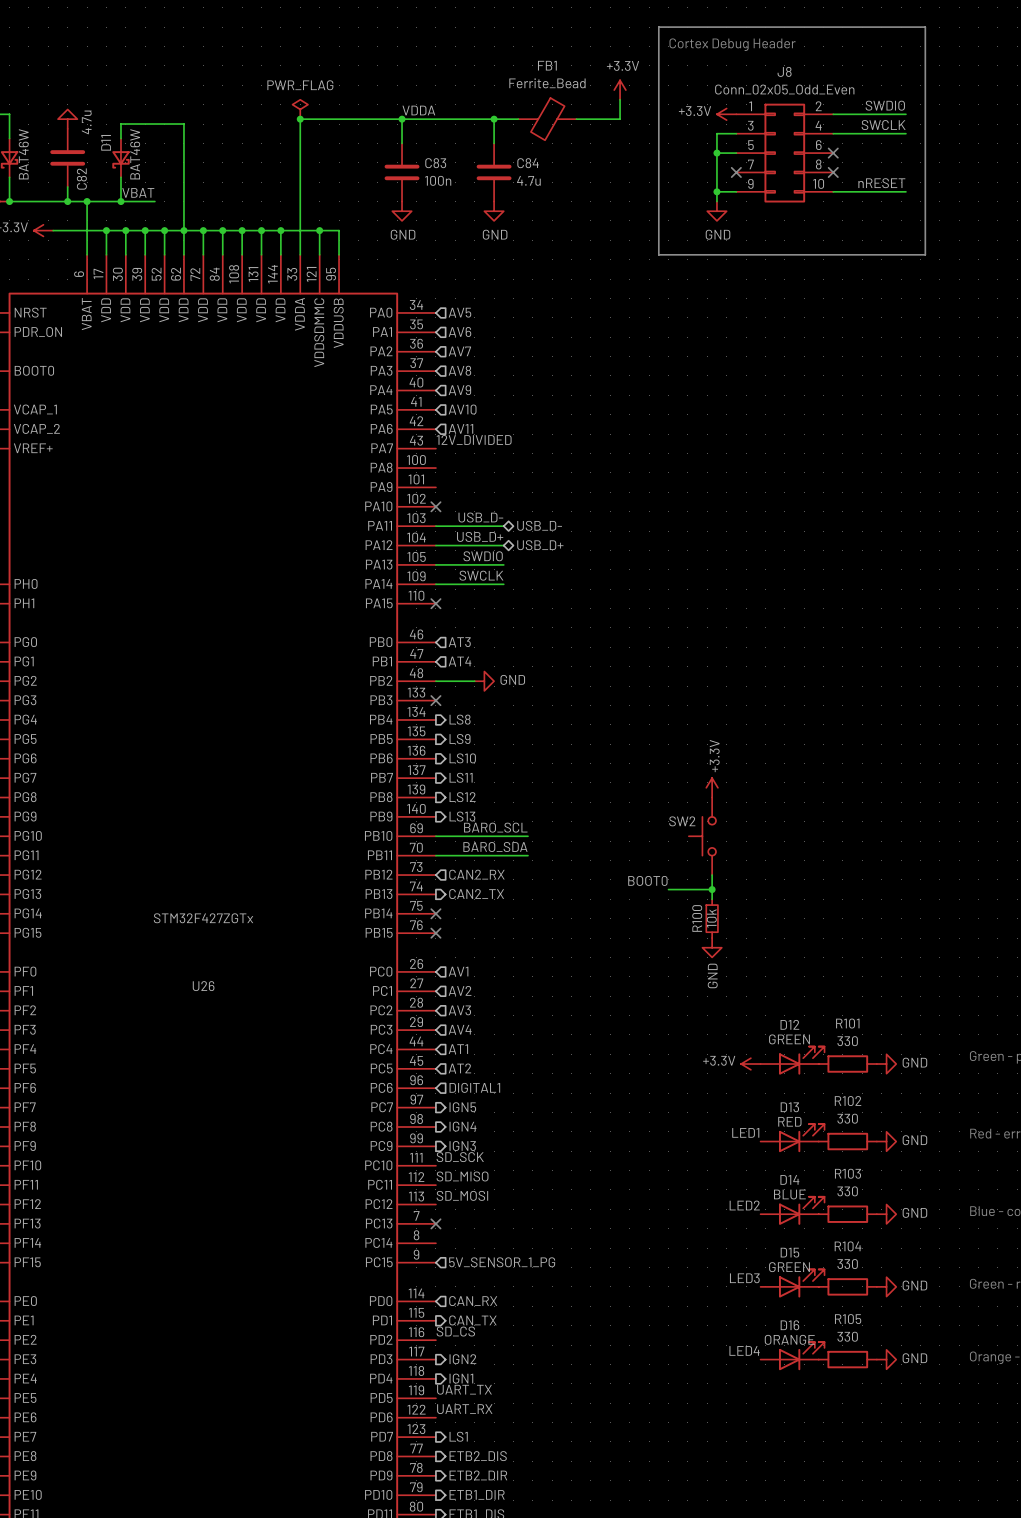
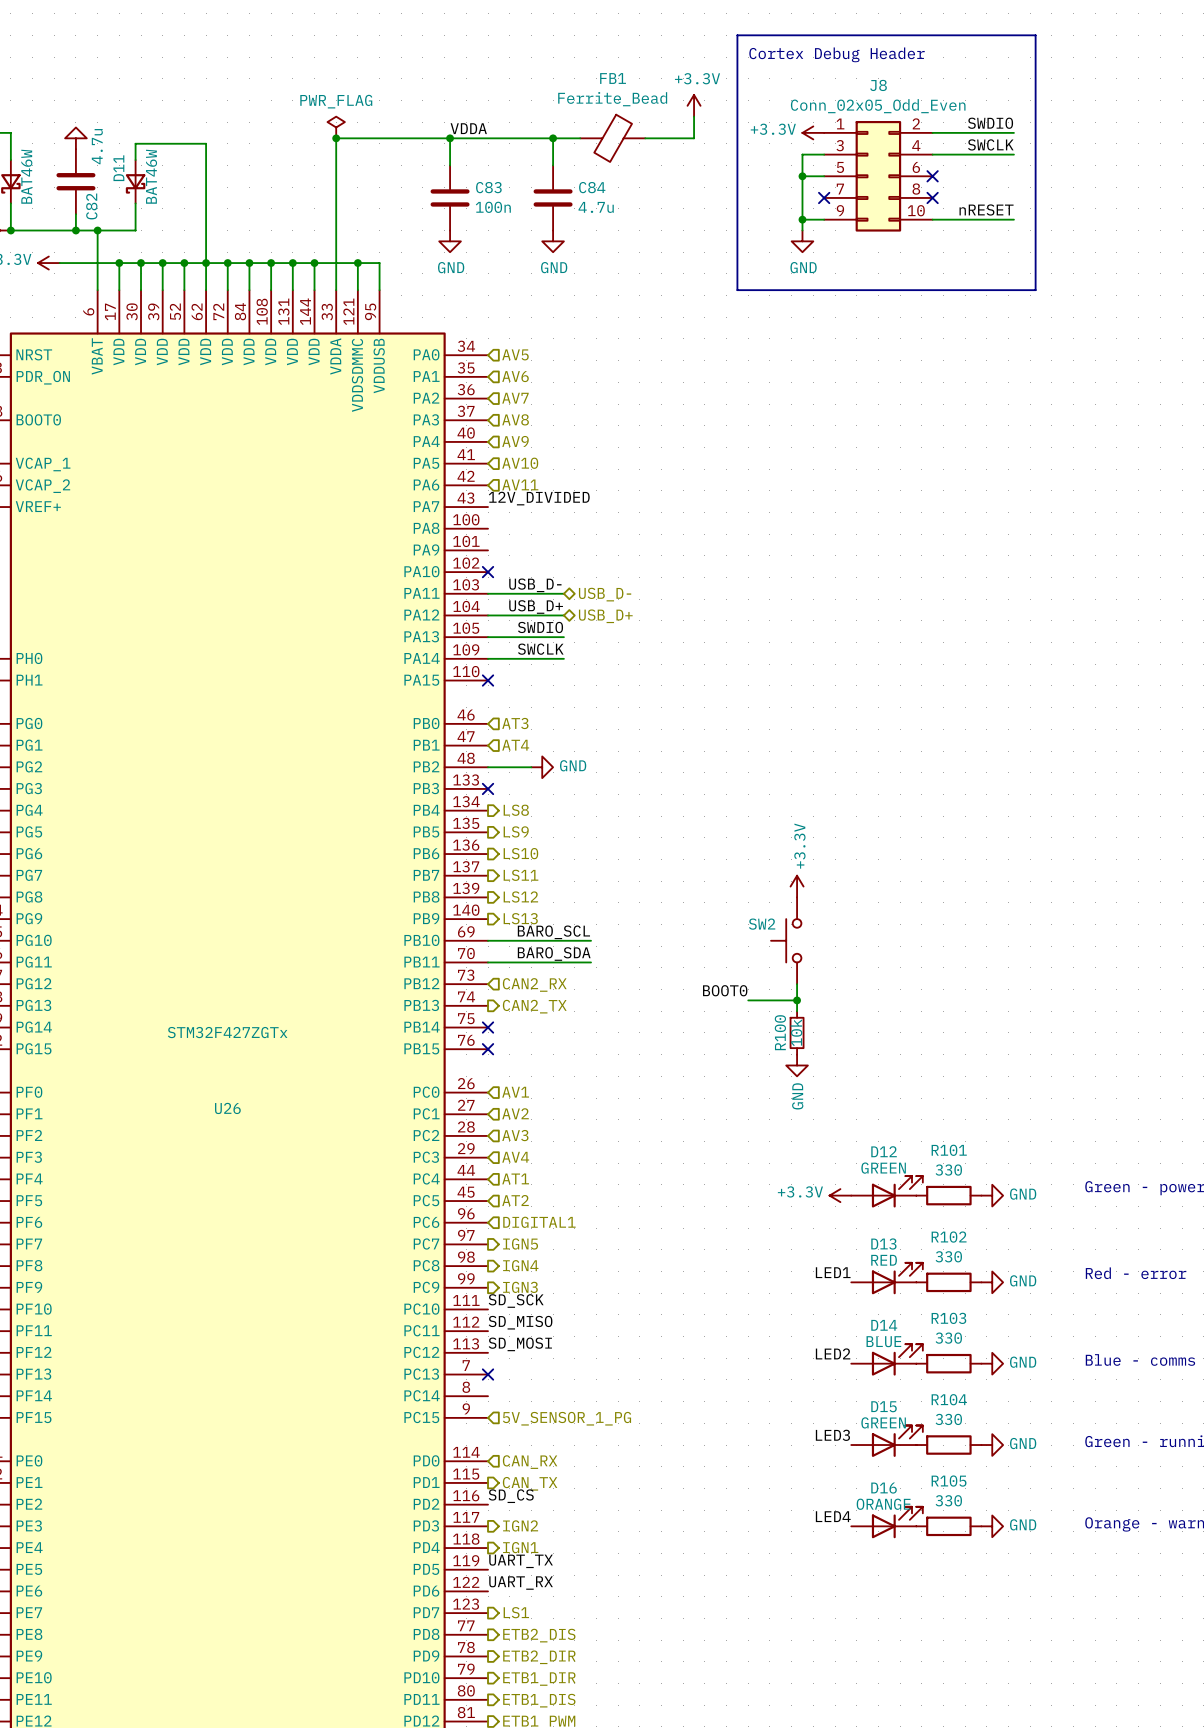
label: VBAT (138, 192) -> none
wire: (120, 201) (154, 201) -> none
junction: (120, 201) -> none

